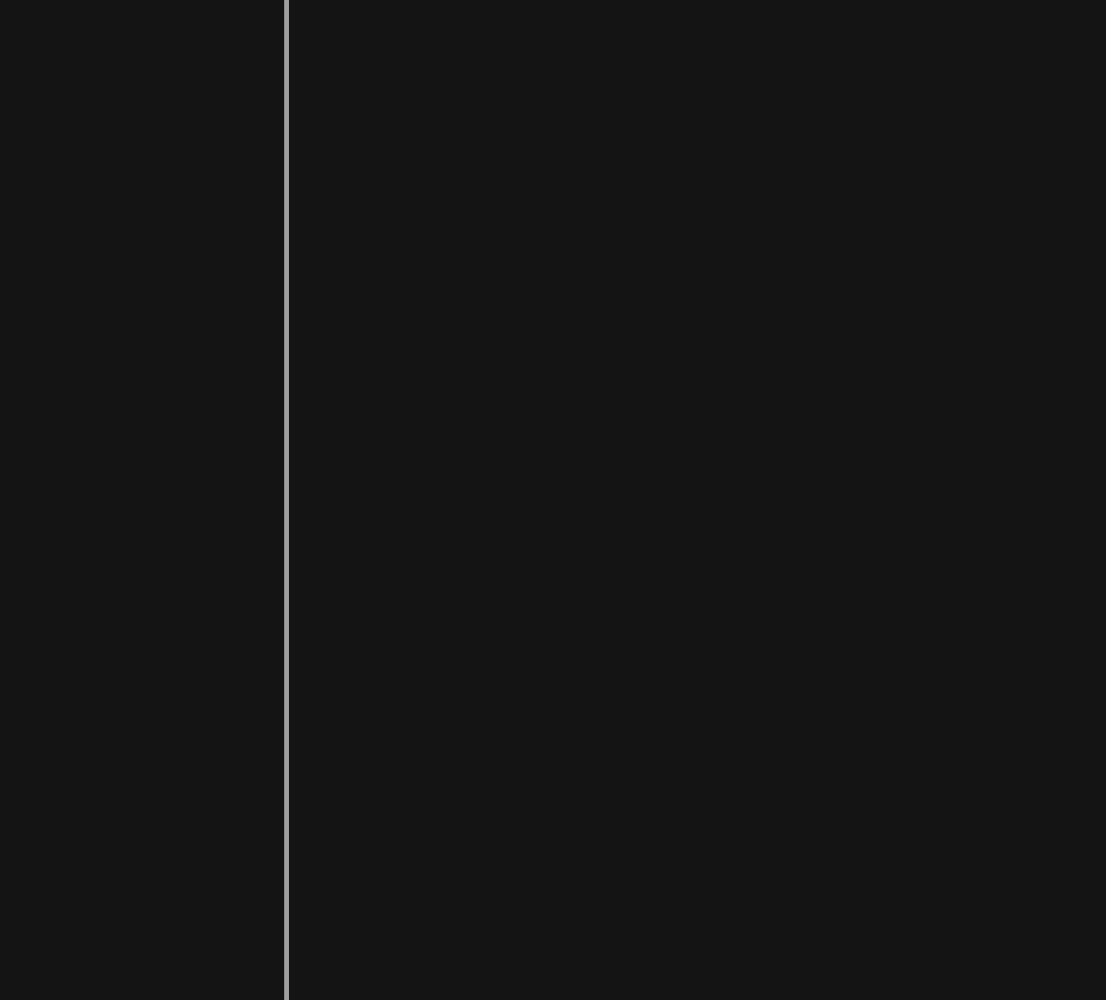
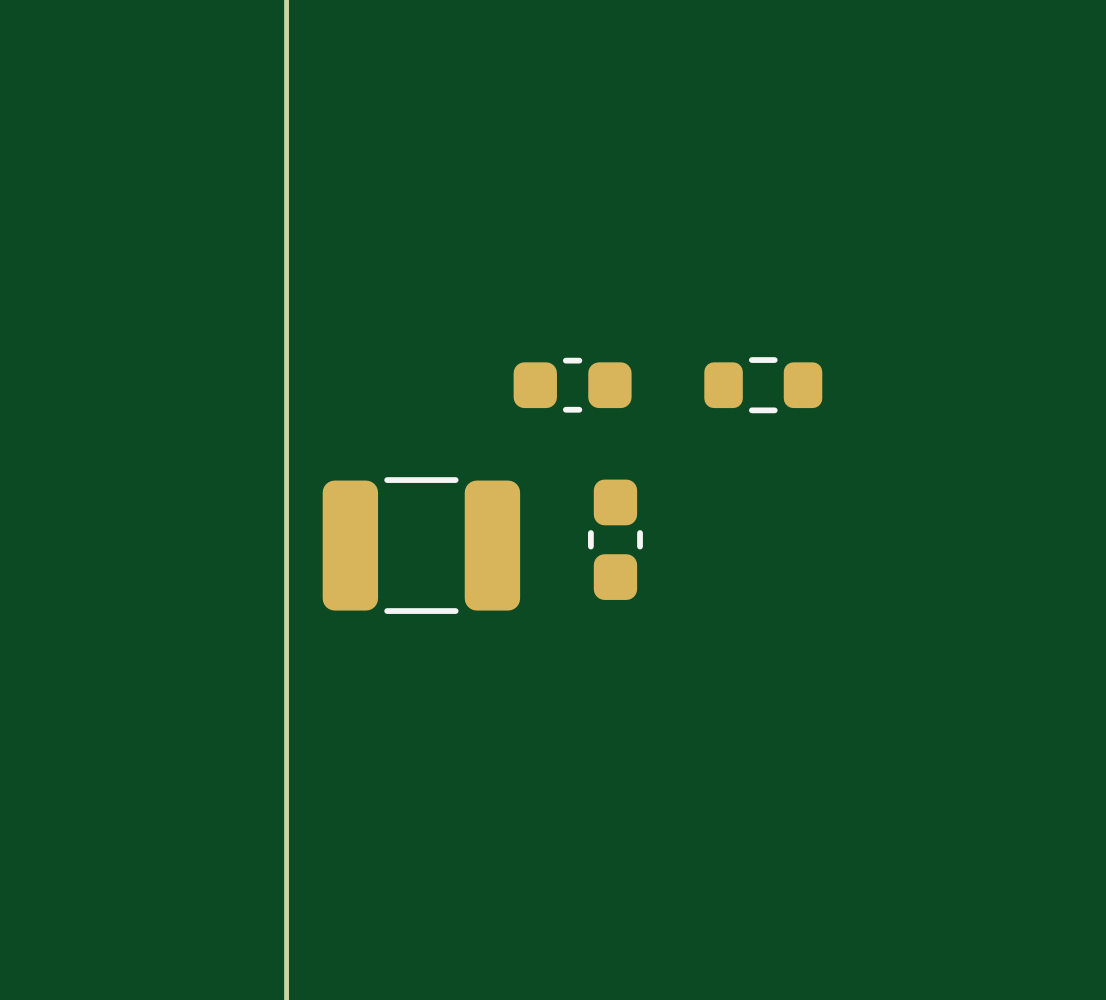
part: none -> (572, 385)
part: none -> (763, 385)
part: none -> (615, 539)
part: none -> (421, 545)

